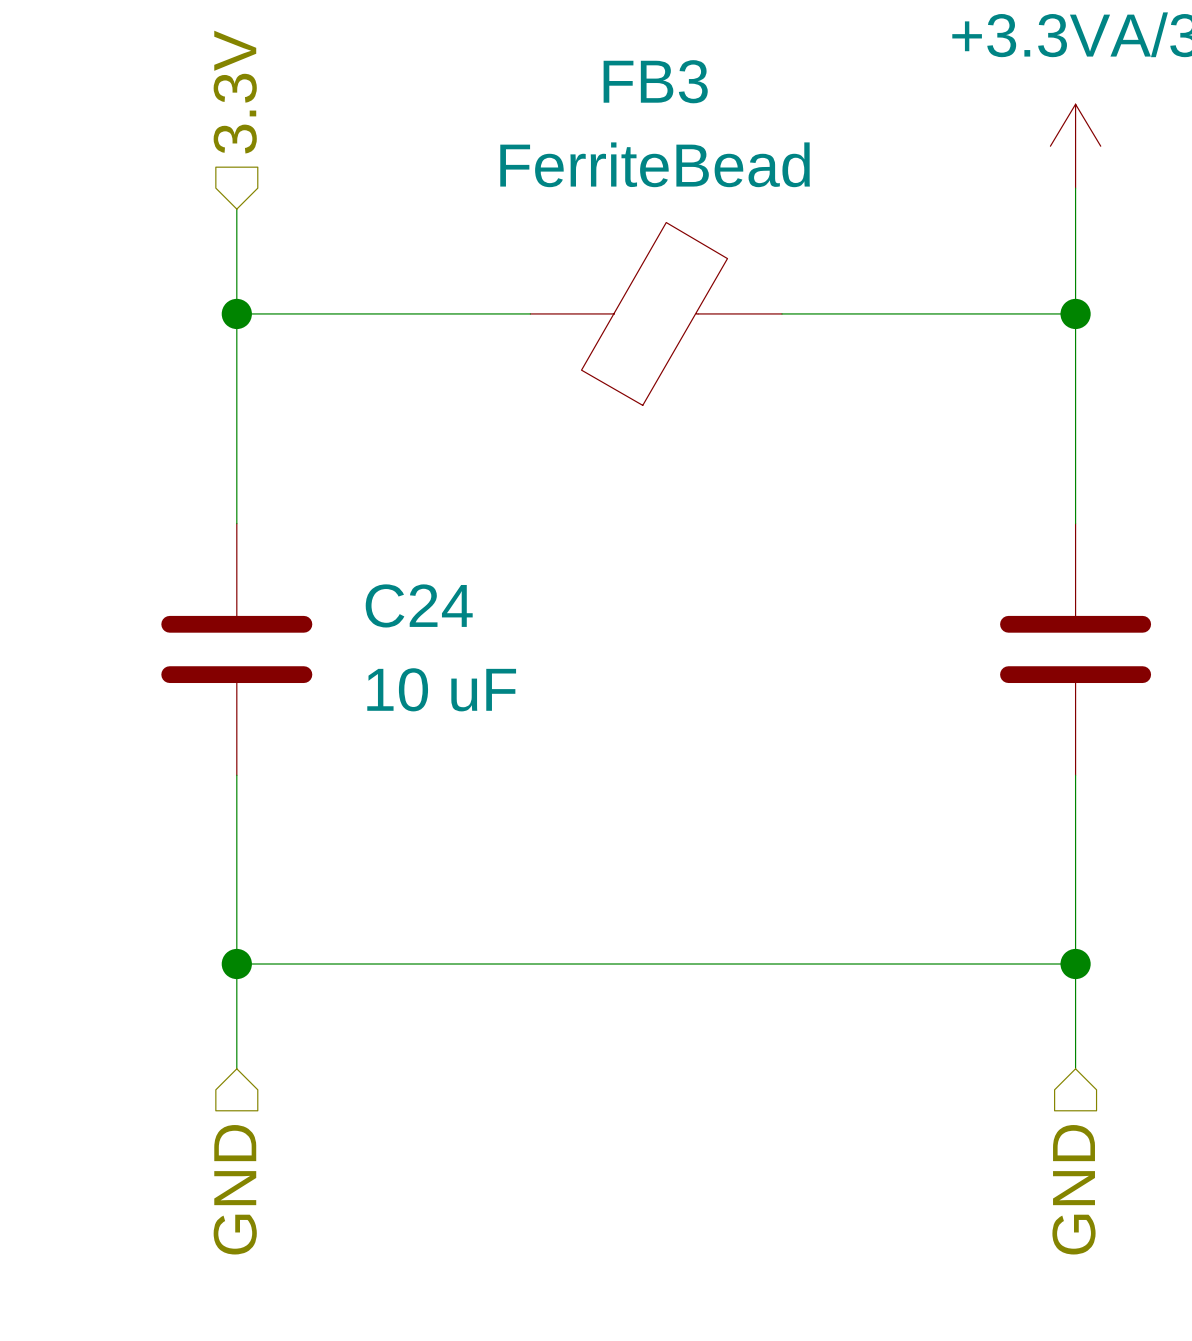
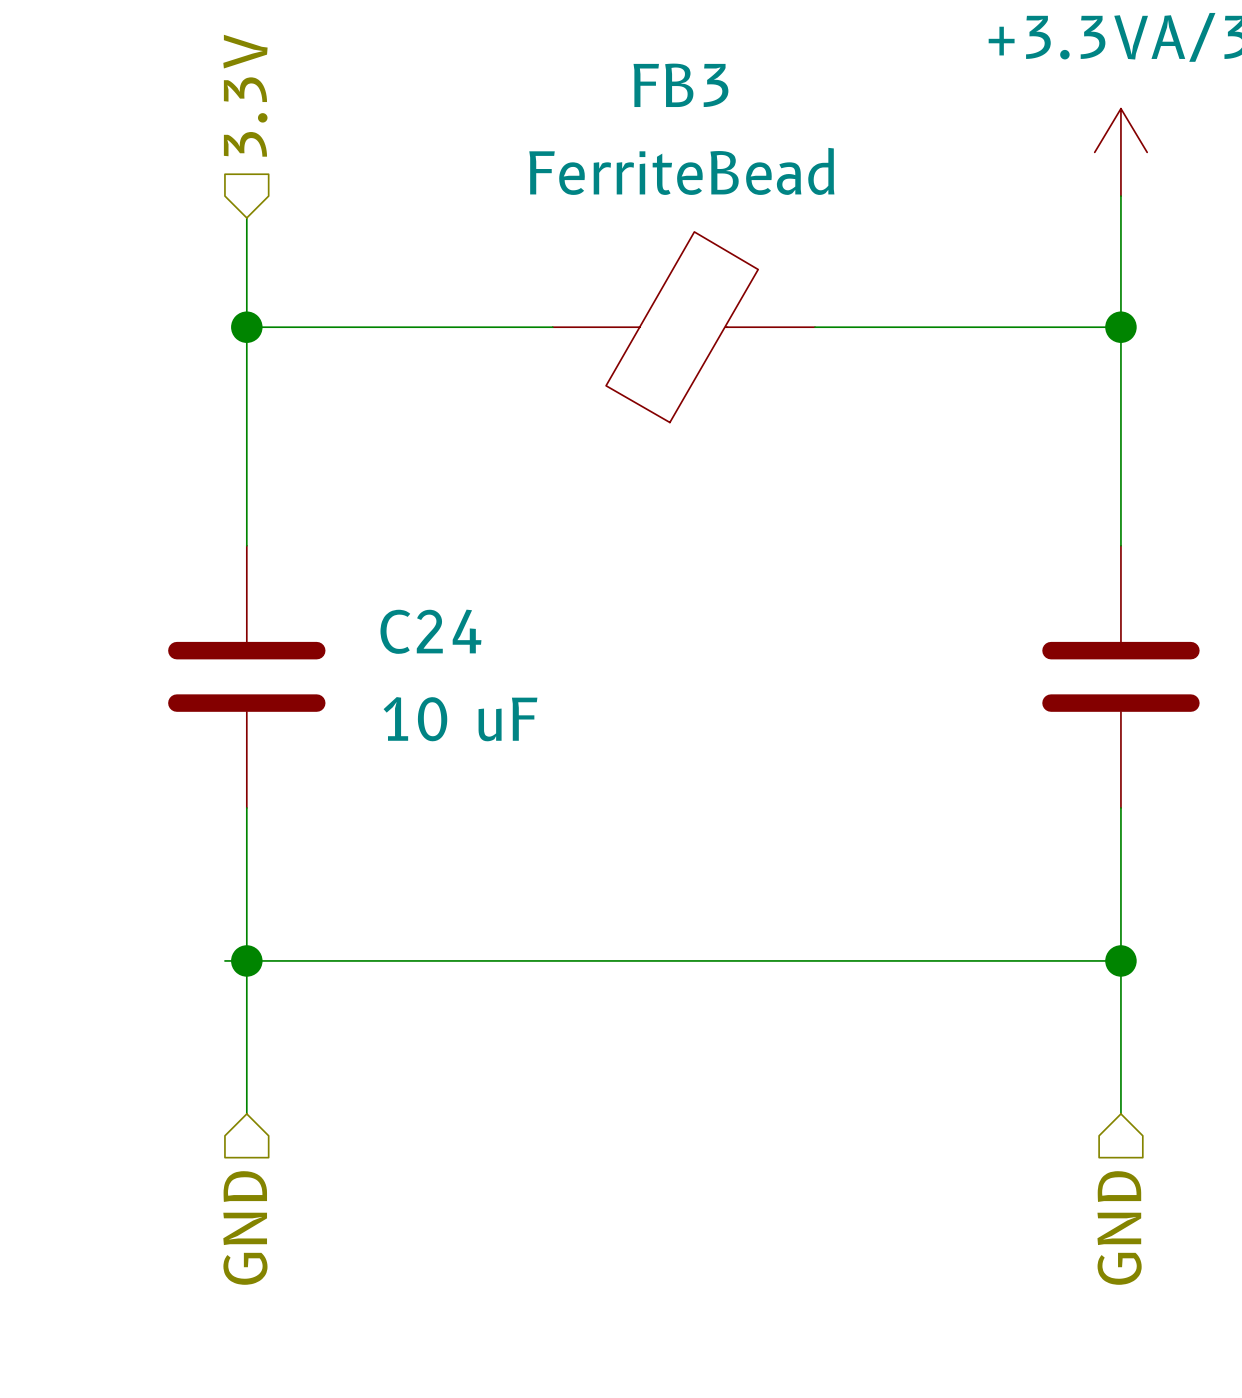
wire: none -> (224, 960) (1120, 960)
wire: (236, 964) (1075, 964) -> none
junction position: (236, 964) -> (246, 960)
junction position: (1075, 964) -> (1120, 960)

